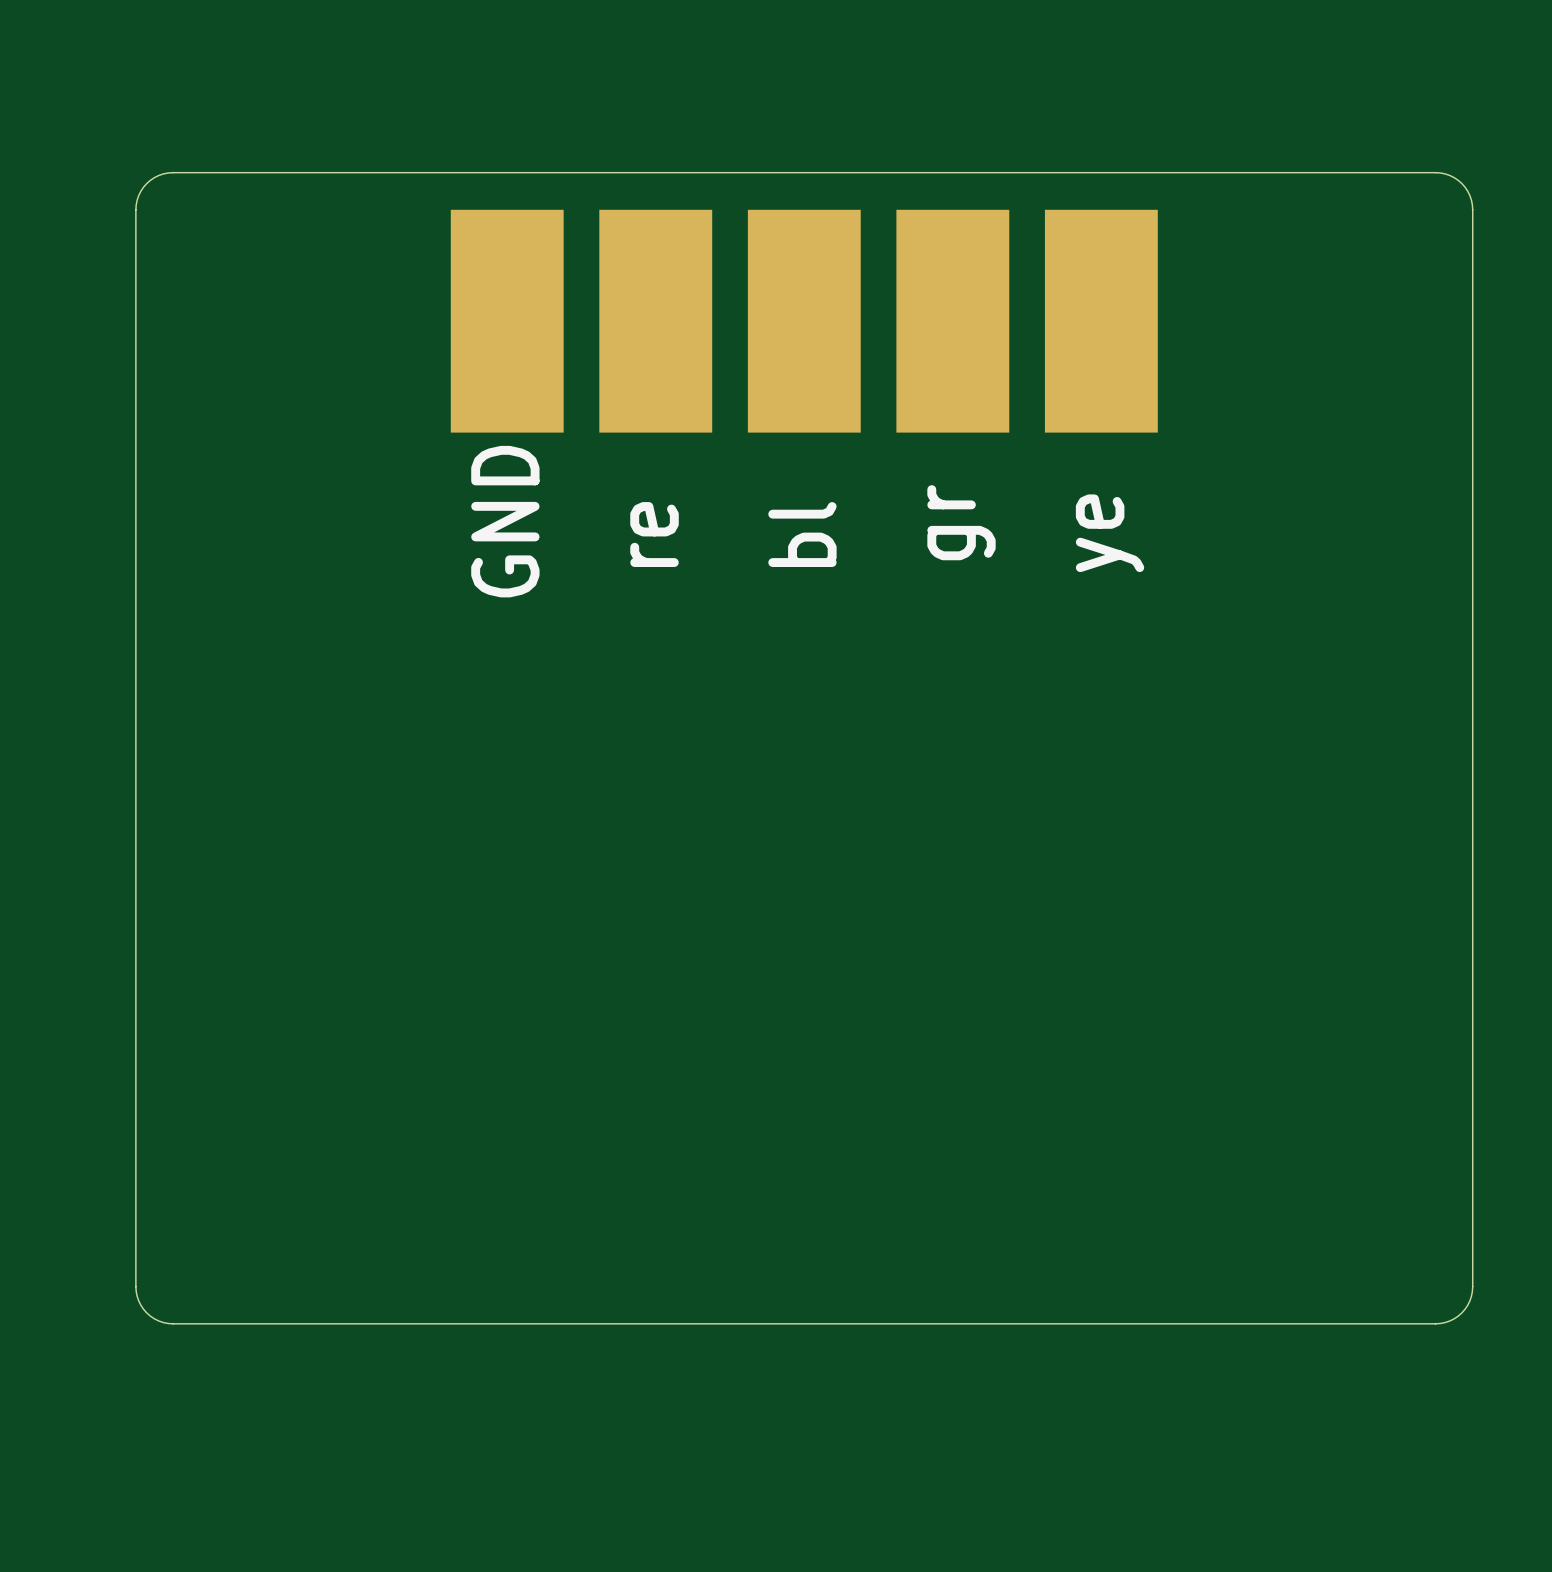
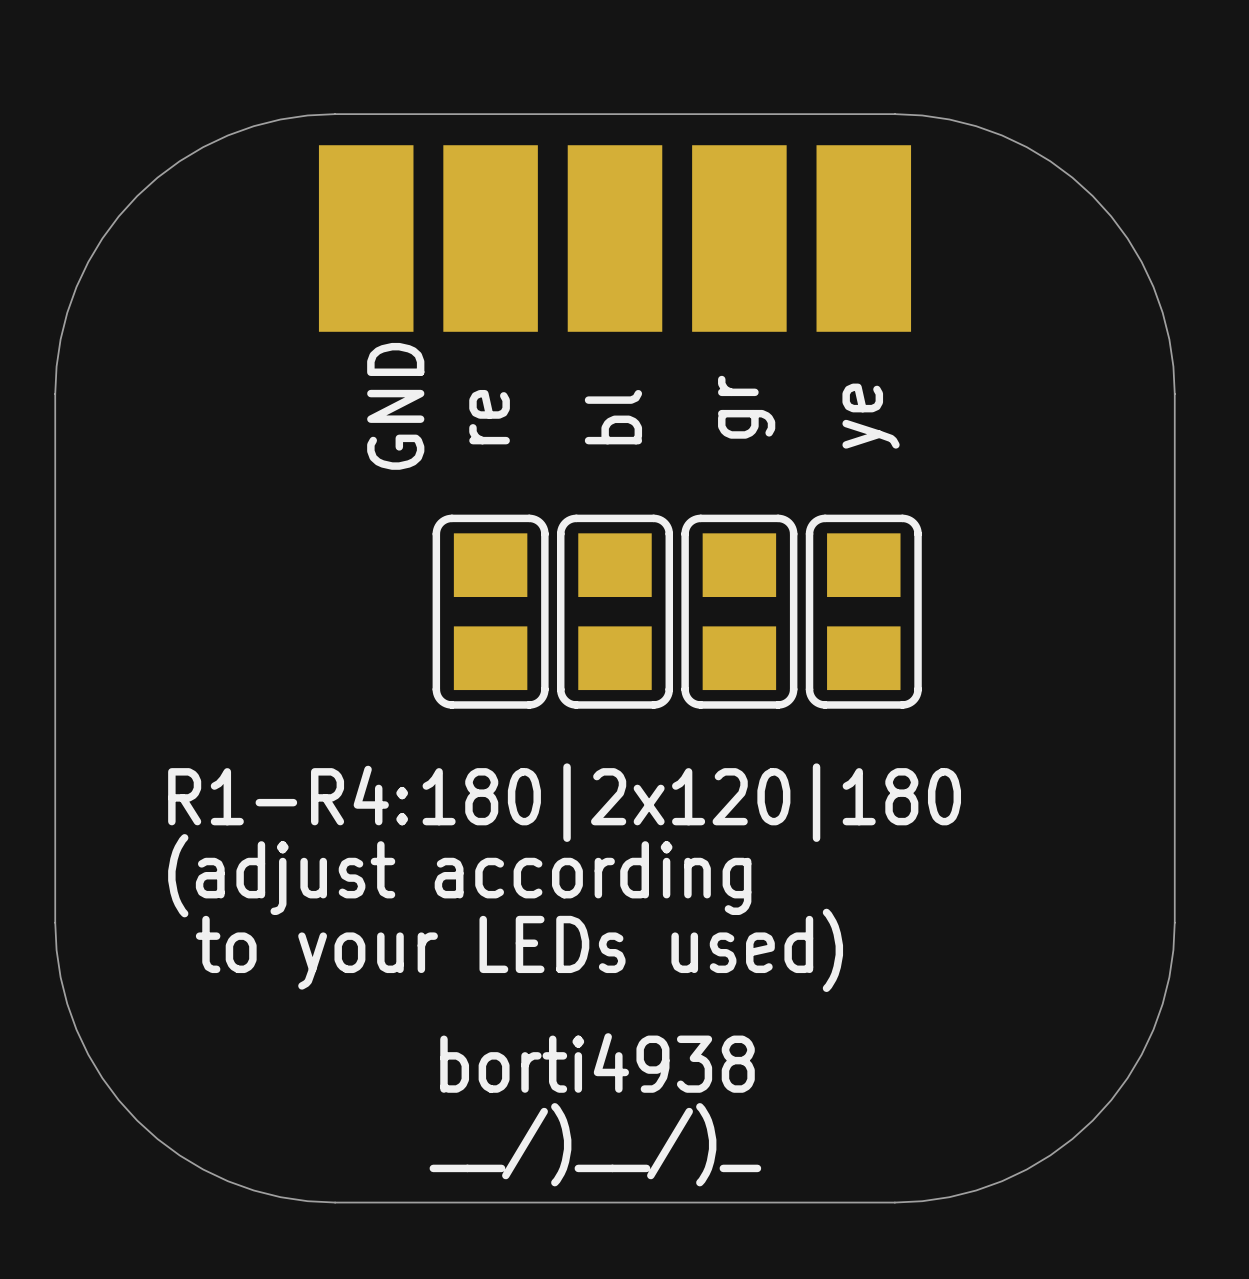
board edge: (470, 172) (173, 172) (158, 175) (146, 183) (138, 195) (135, 209) (135, 506) -> (335, 114) (280, 119) (228, 135) (179, 161) (137, 196) (102, 238) (76, 286) (60, 339) (55, 394)
board edge: (1138, 172) (1435, 172) (1449, 175) (1461, 183) (1469, 195) (1472, 209) (1472, 506) -> (894, 114) (949, 119) (1001, 135) (1050, 161) (1092, 196) (1127, 238) (1153, 286) (1169, 339) (1174, 394)
text position: GND (505, 521) -> GND (395, 406)
part: none -> (490, 611)
part: none -> (614, 611)
part: none -> (739, 611)
part: none -> (863, 611)
text: none -> R1-R4: (288, 795)
text: none -> 180|2x120|180 (691, 802)
text: none -> (adjust according (459, 875)
board edge: (1472, 1138) (1471, 1296) (1465, 1309) (1458, 1316) (1445, 1322) (1435, 1323) (168, 1323) (158, 1320) (146, 1312) (138, 1300) (136, 1291) (135, 1138) -> (1174, 922) (1169, 977) (1153, 1029) (1127, 1078) (1092, 1120) (1050, 1155) (1001, 1181) (949, 1197) (894, 1202) (335, 1202) (307, 1201) (253, 1190) (203, 1169) (179, 1155) (157, 1139) (118, 1100) (88, 1054) (76, 1029) (60, 977) (55, 922)
text: none -> to your LEDs used) (519, 950)
text: none -> borti4938 (597, 1062)
text: none -> __/)__/)_ (595, 1144)

